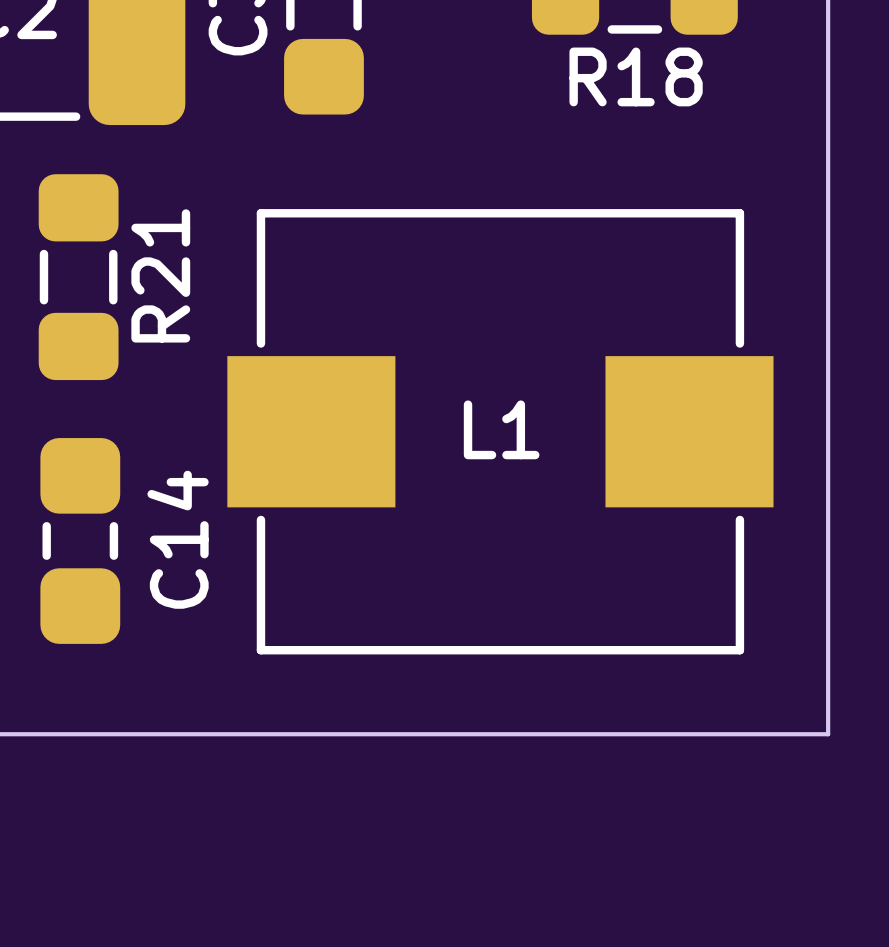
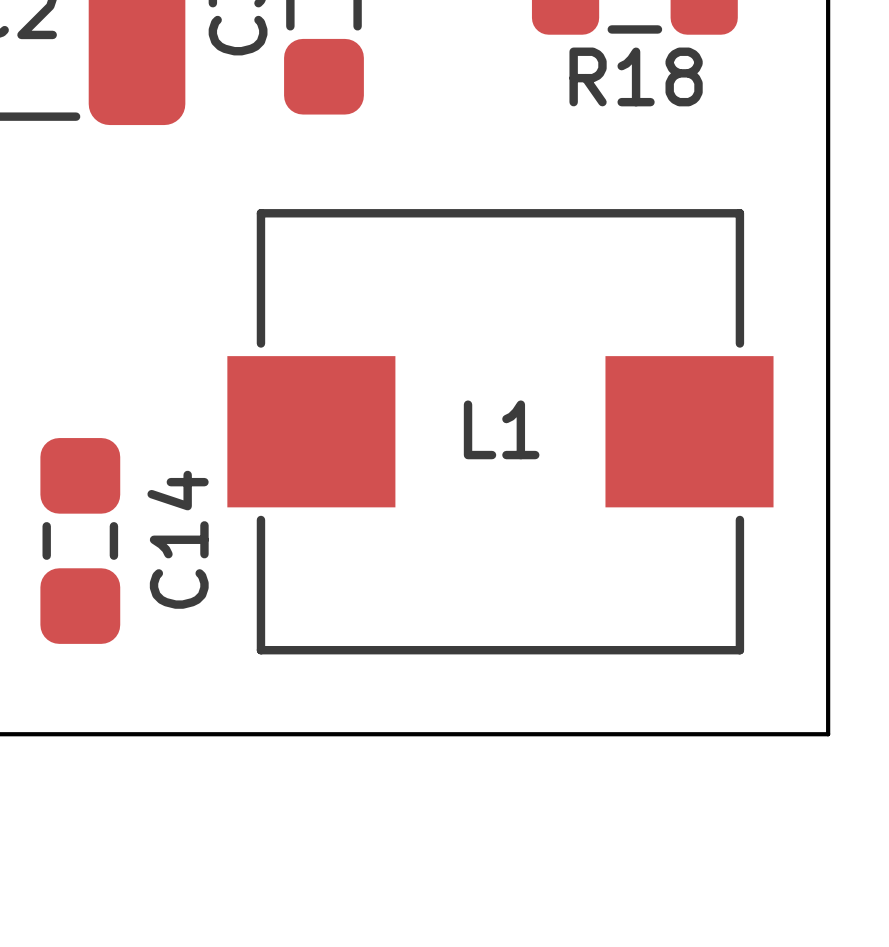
line: (43, 254) (43, 300) -> none
line: (113, 254) (113, 300) -> none
R21: (78, 277) -> none

